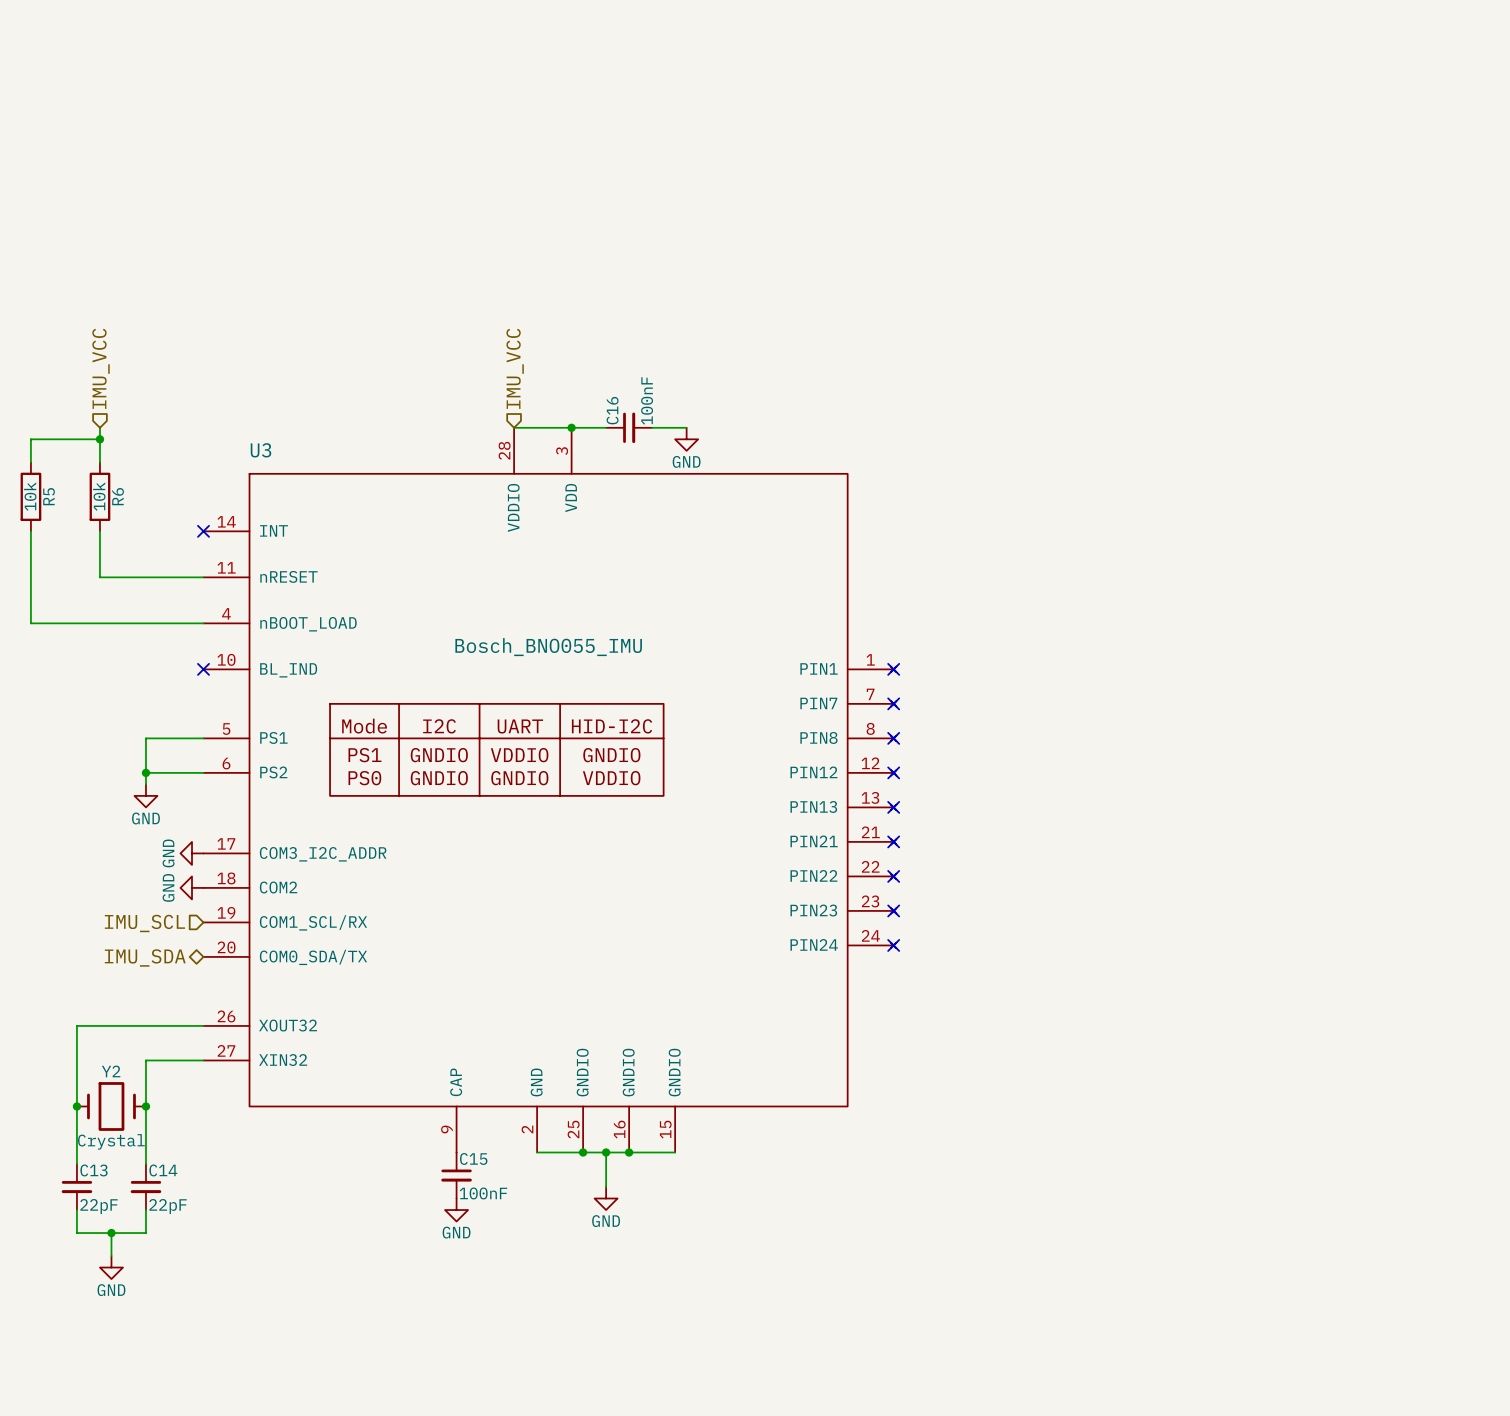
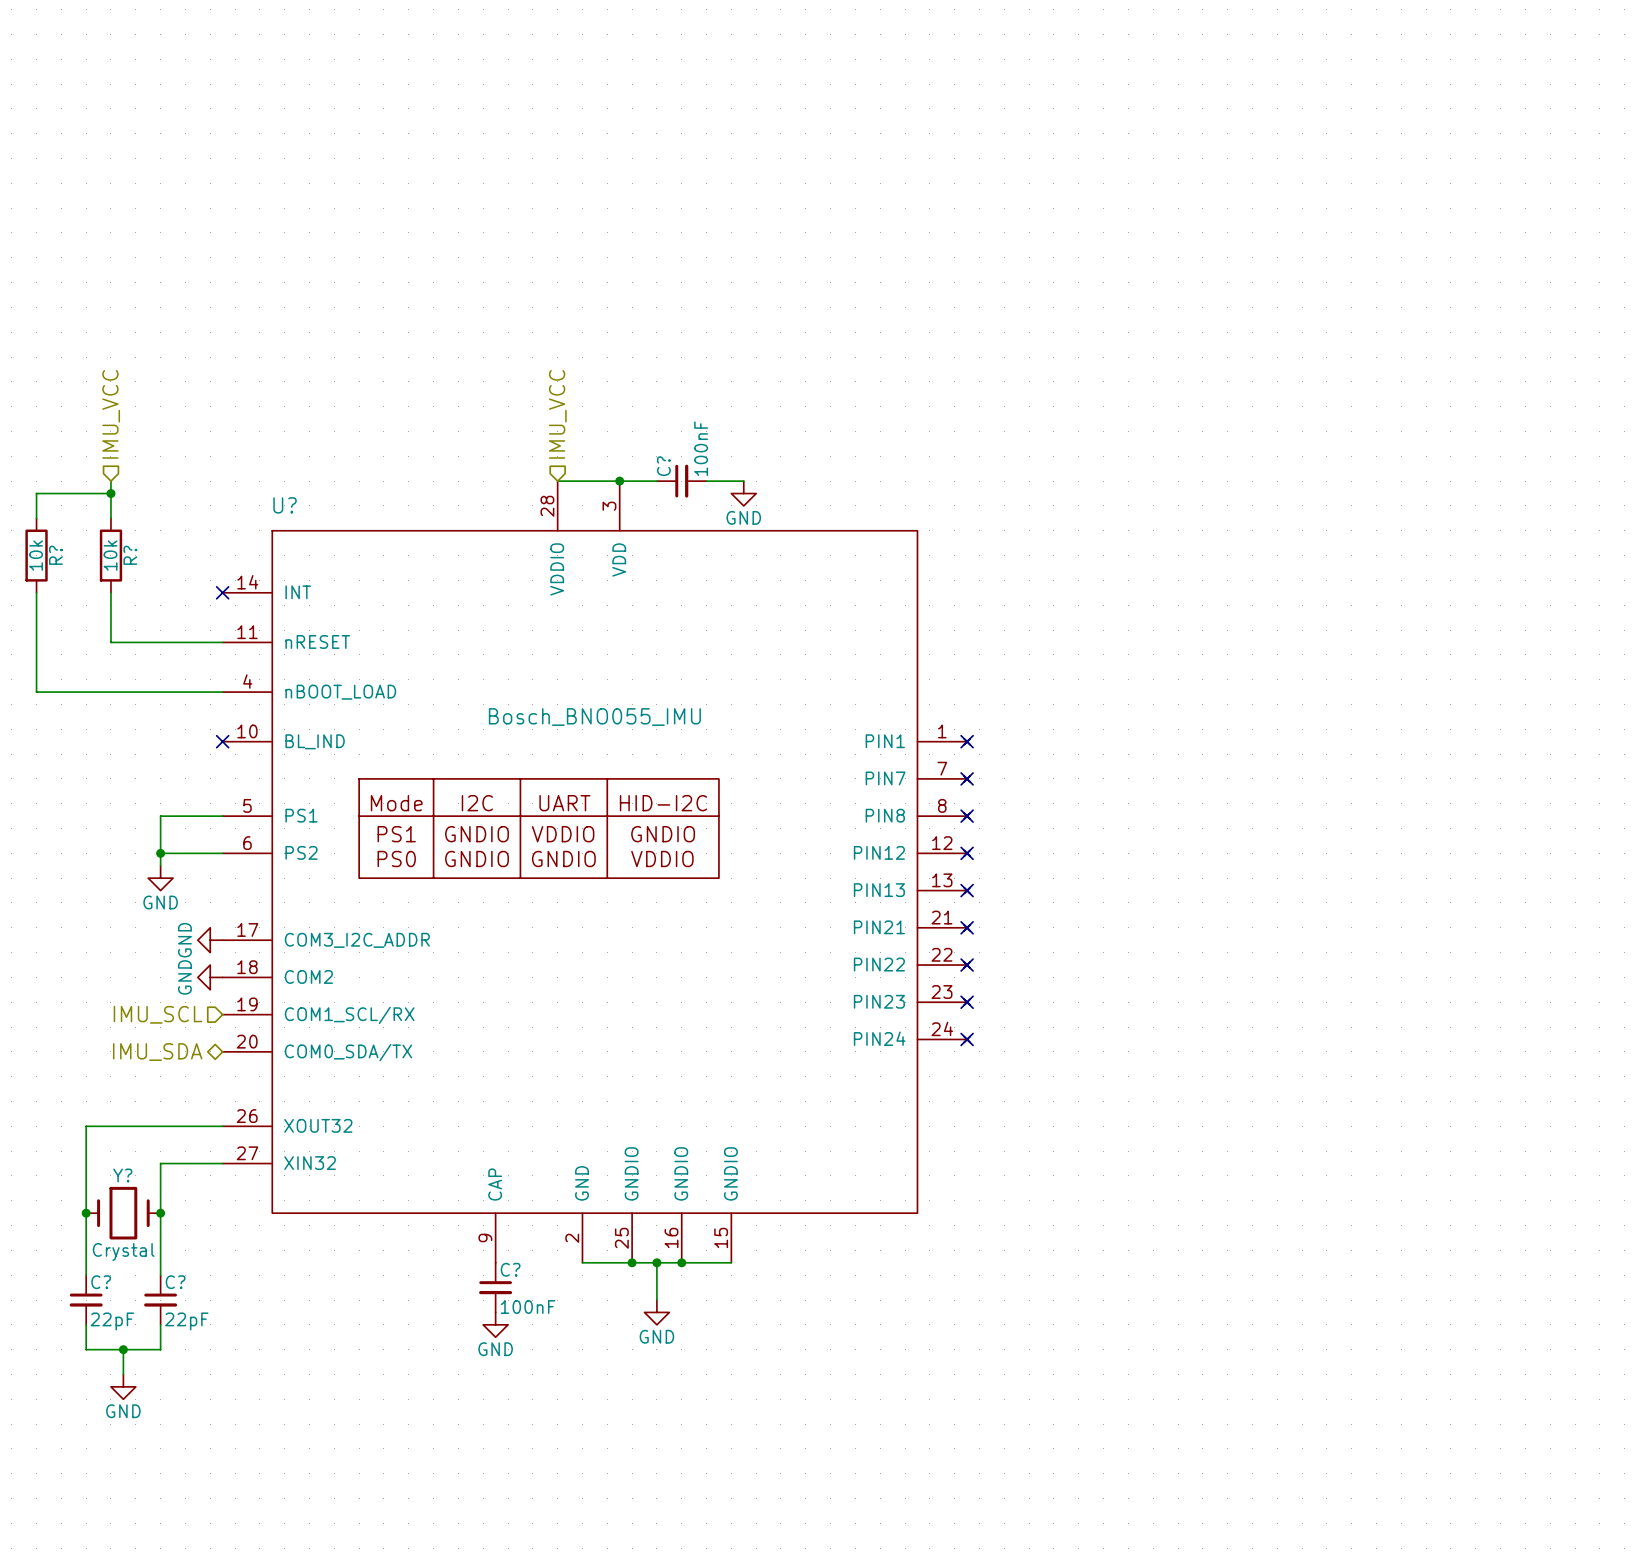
C16 name: C16 (612, 410) -> C? (663, 466)
U3 name: U3 (260, 450) -> U? (285, 505)
R5 name: R5 (49, 496) -> R? (55, 555)
R6 name: R6 (118, 496) -> R? (130, 555)
Y2 name: Y2 (111, 1071) -> Y? (122, 1175)
C15 name: C15 (473, 1158) -> C? (510, 1269)
C13 name: C13 (94, 1170) -> C? (101, 1282)
C14 name: C14 (163, 1170) -> C? (175, 1282)

